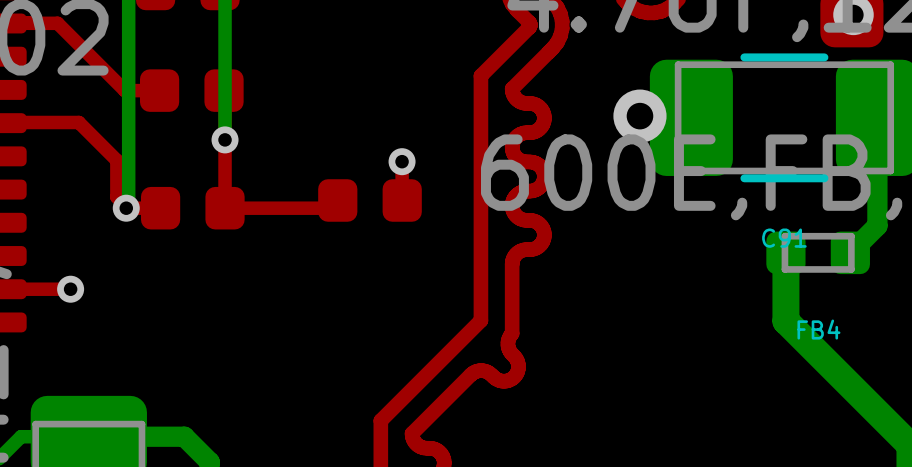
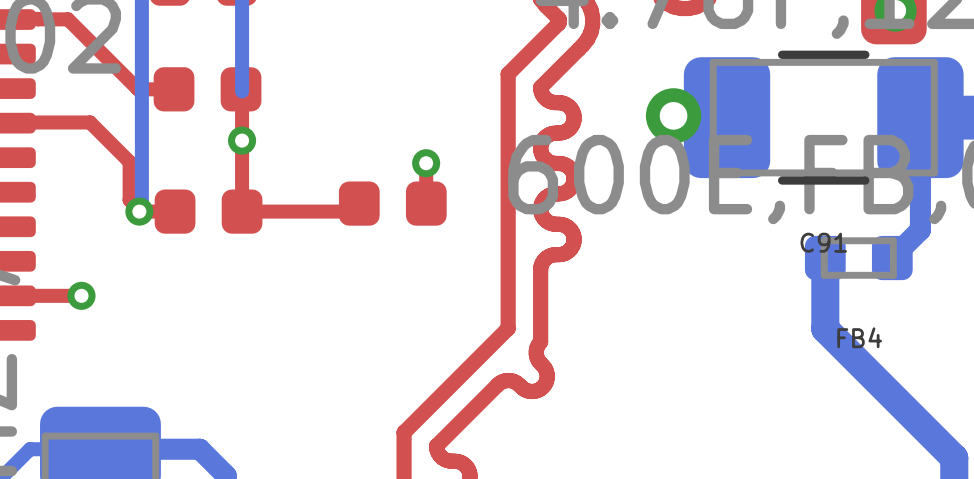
bottom track: (225, 92) (225, 139) -> none

